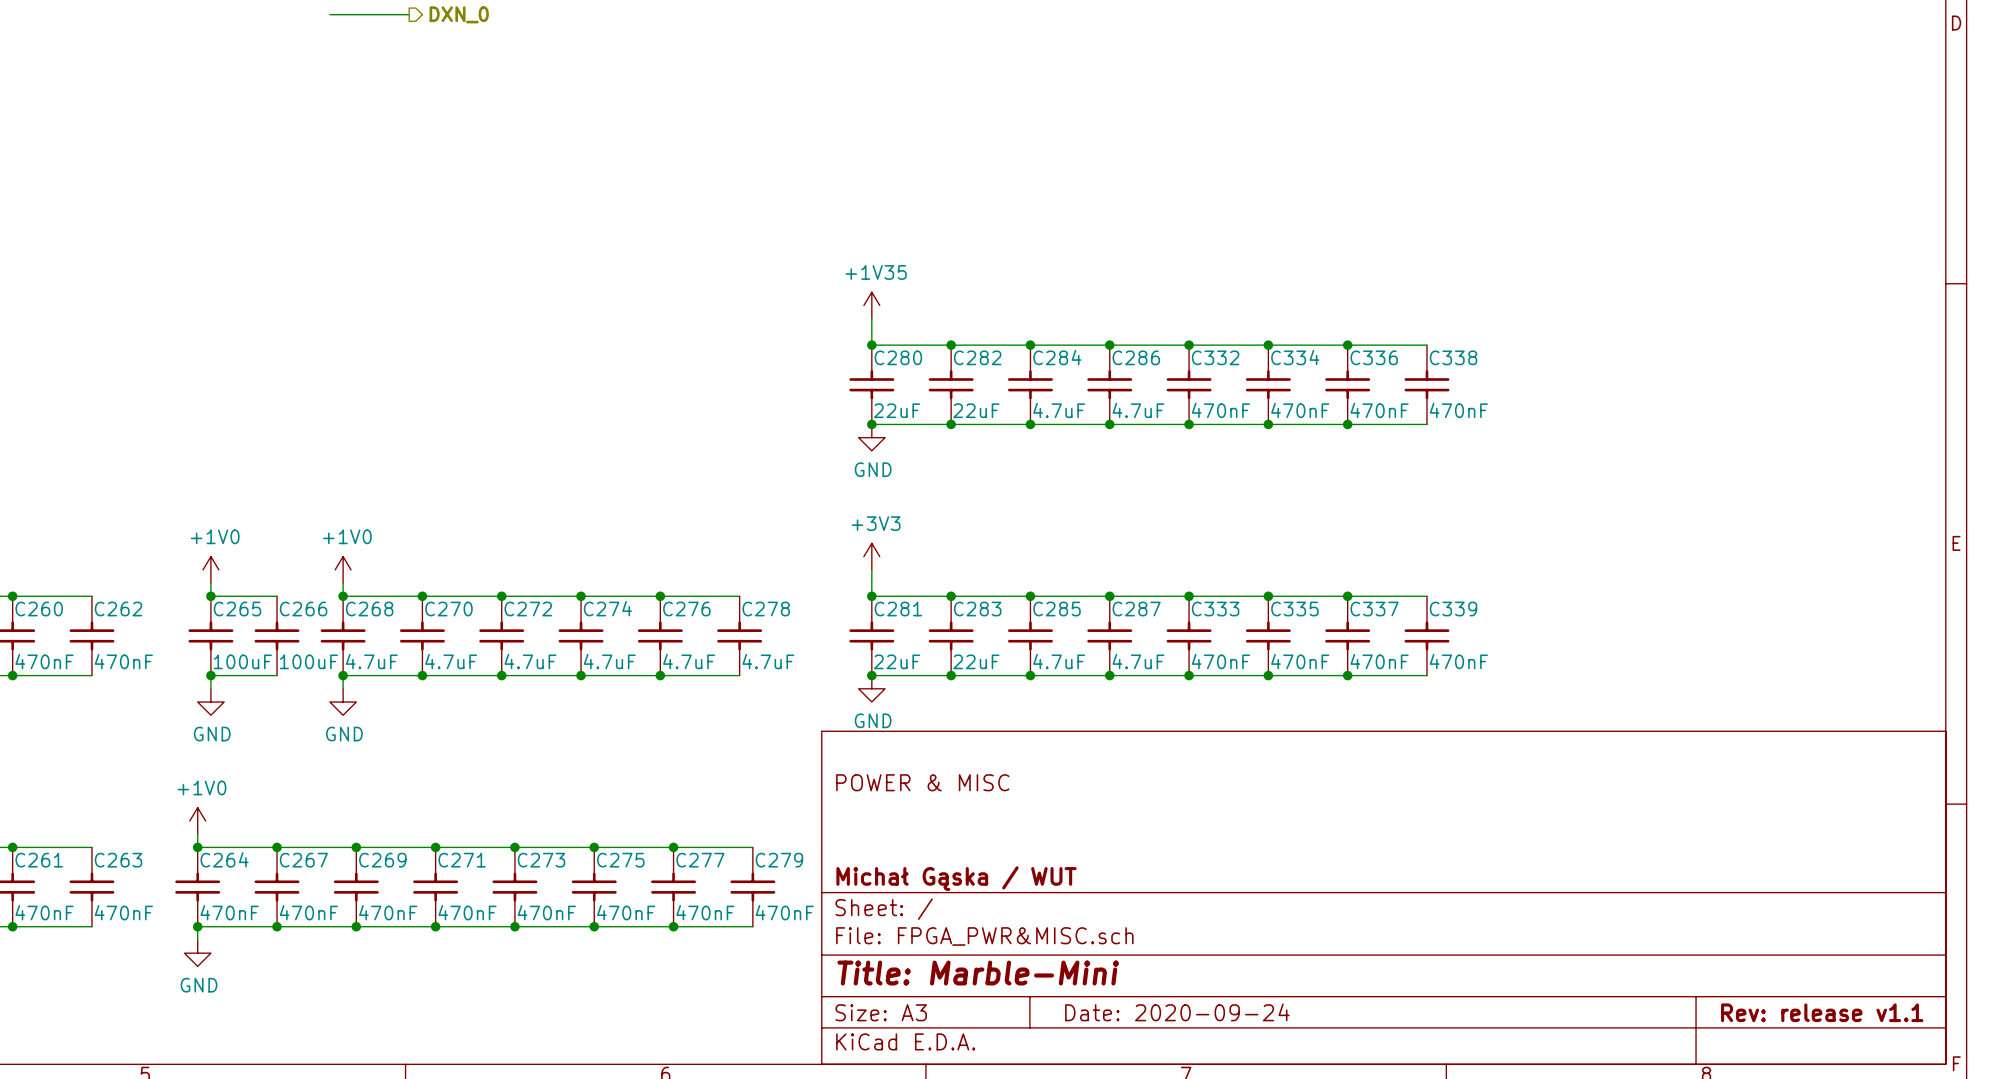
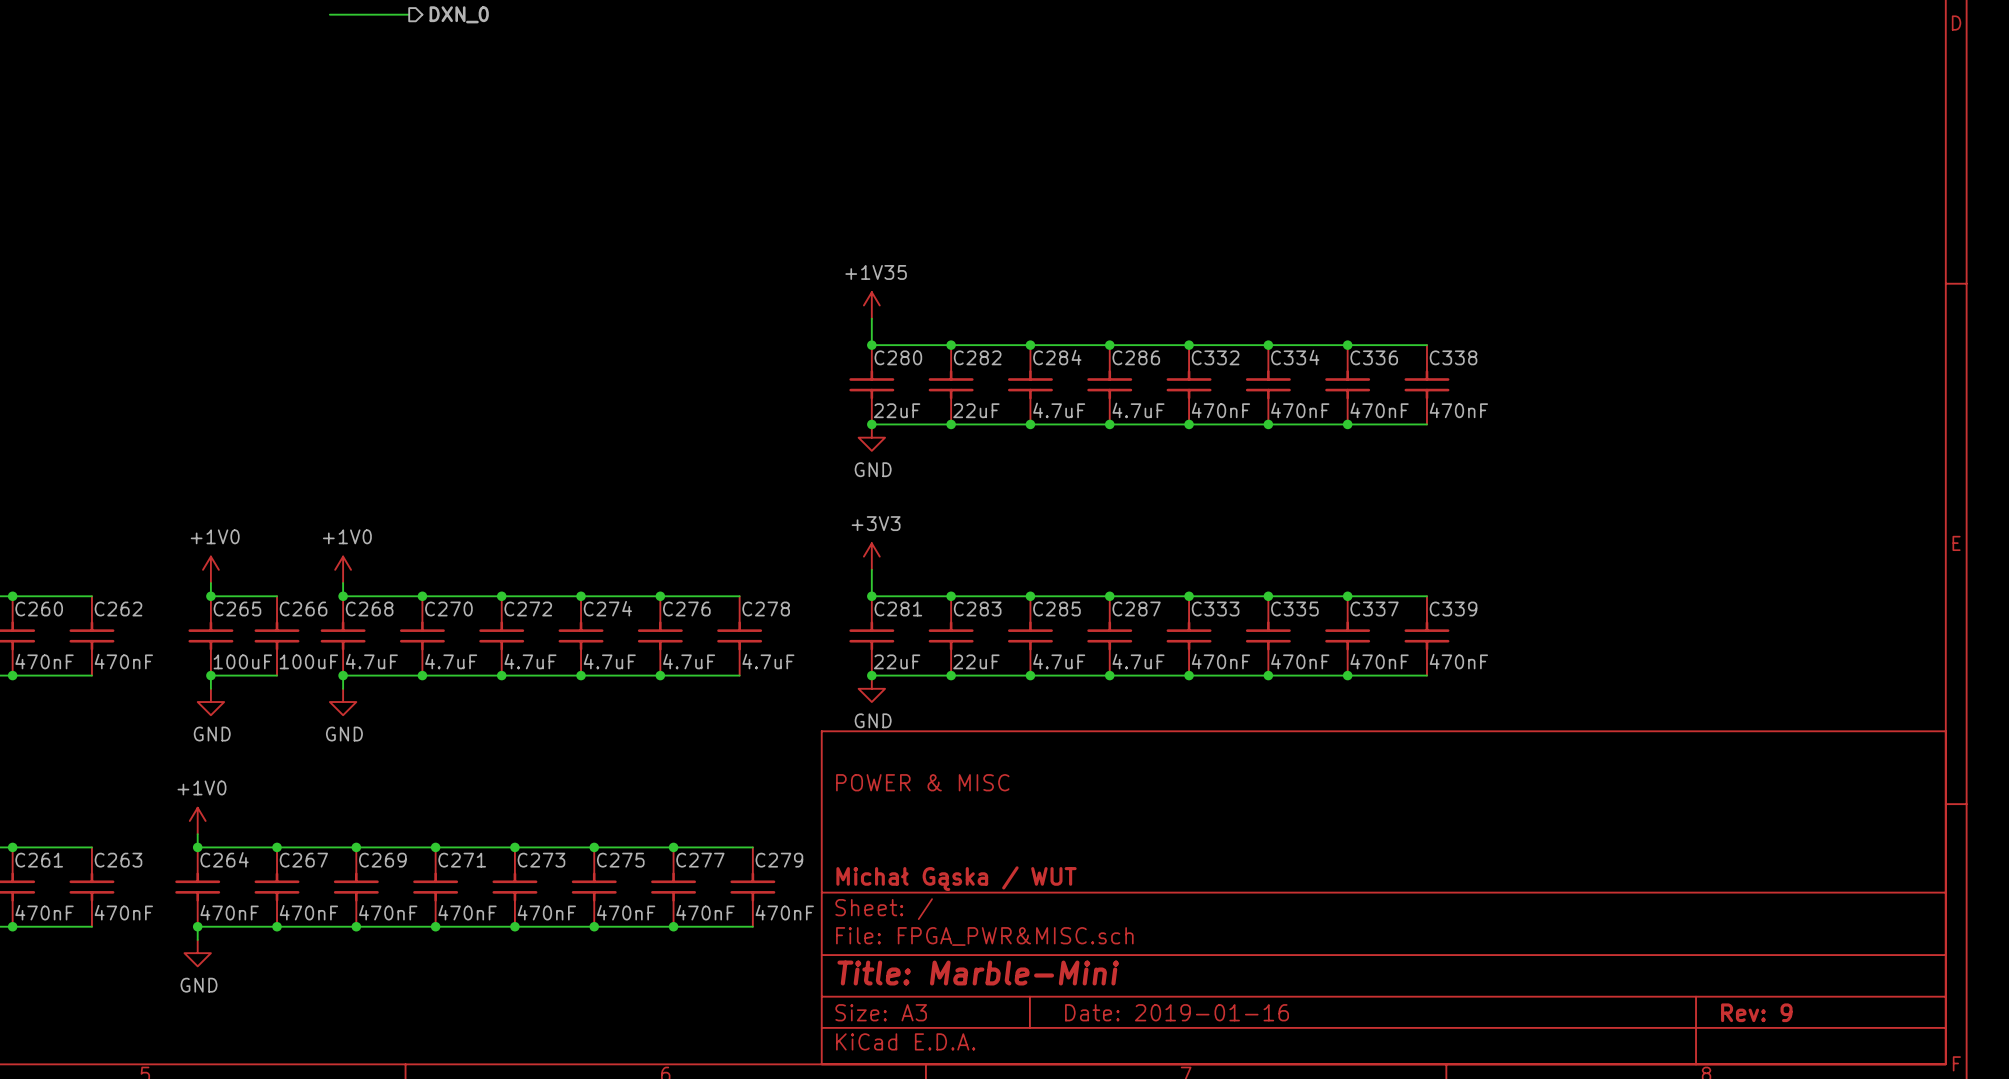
title block: Date: 2020-09-24 (1177, 1012) -> Date: 2019-01-16 (1177, 1012)
title block: Rev: release v1.1 (1822, 1012) -> Rev: 9 (1756, 1012)

